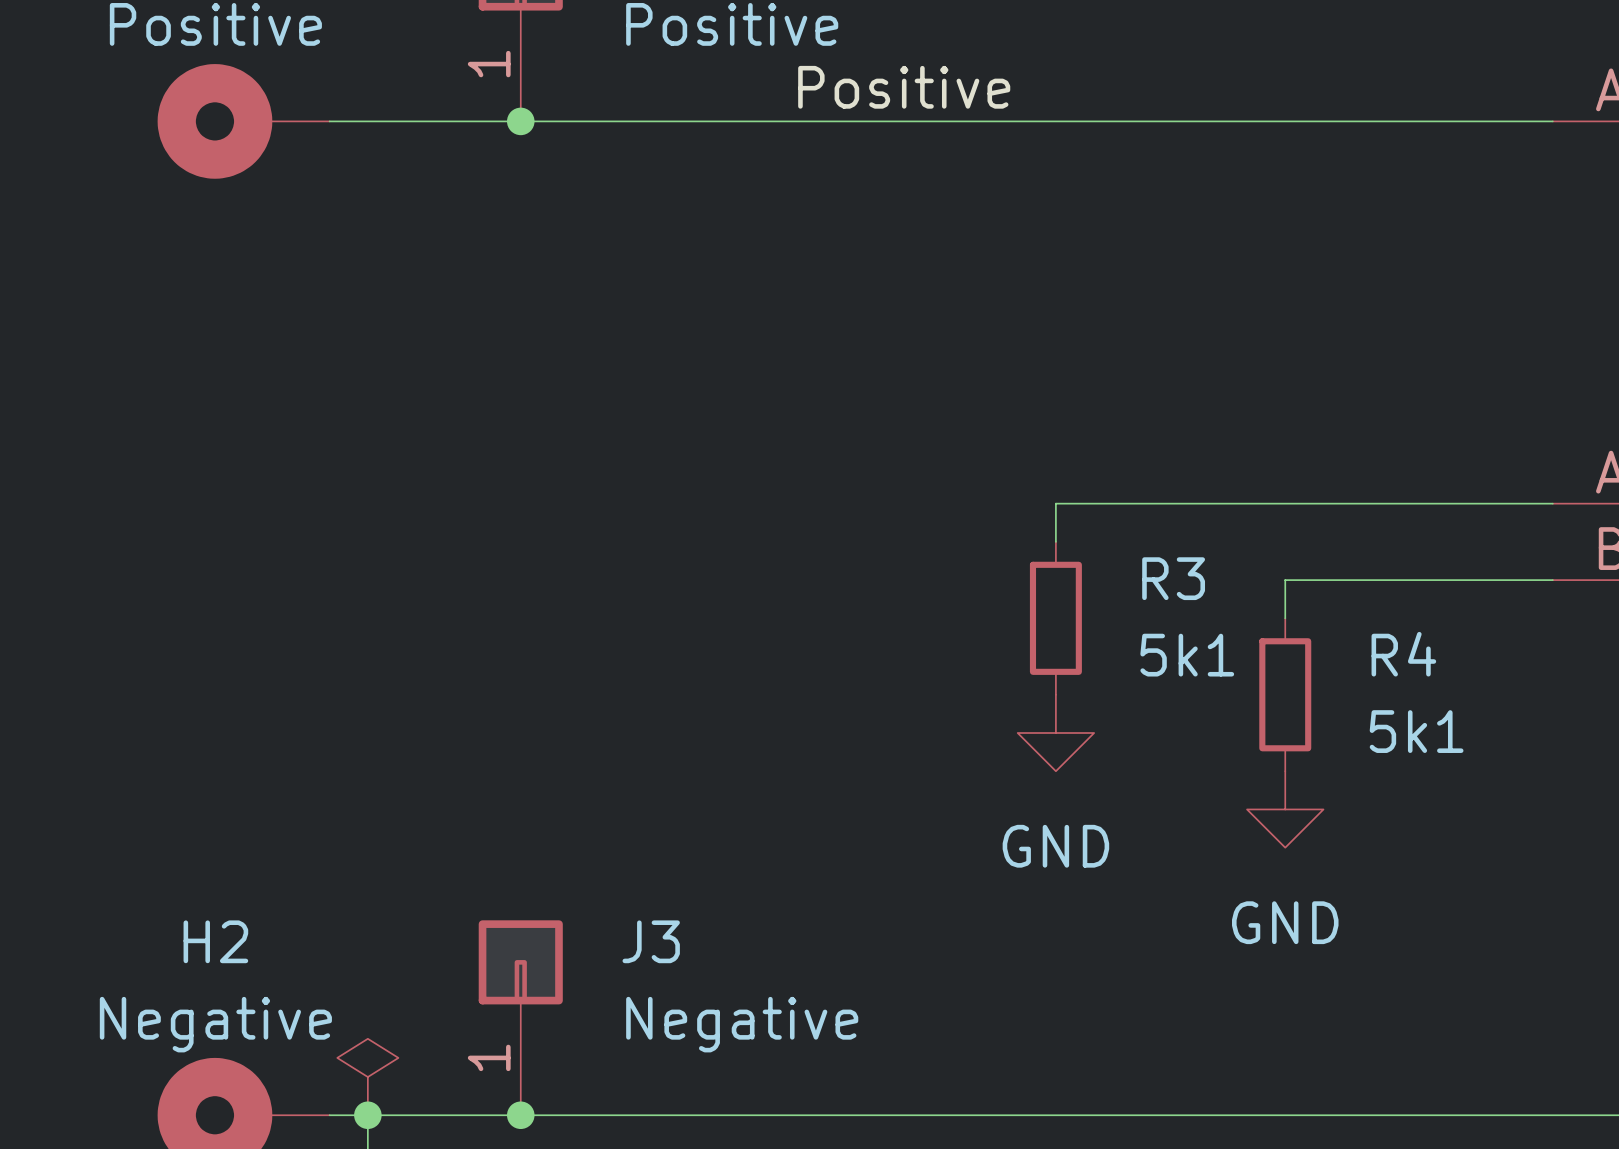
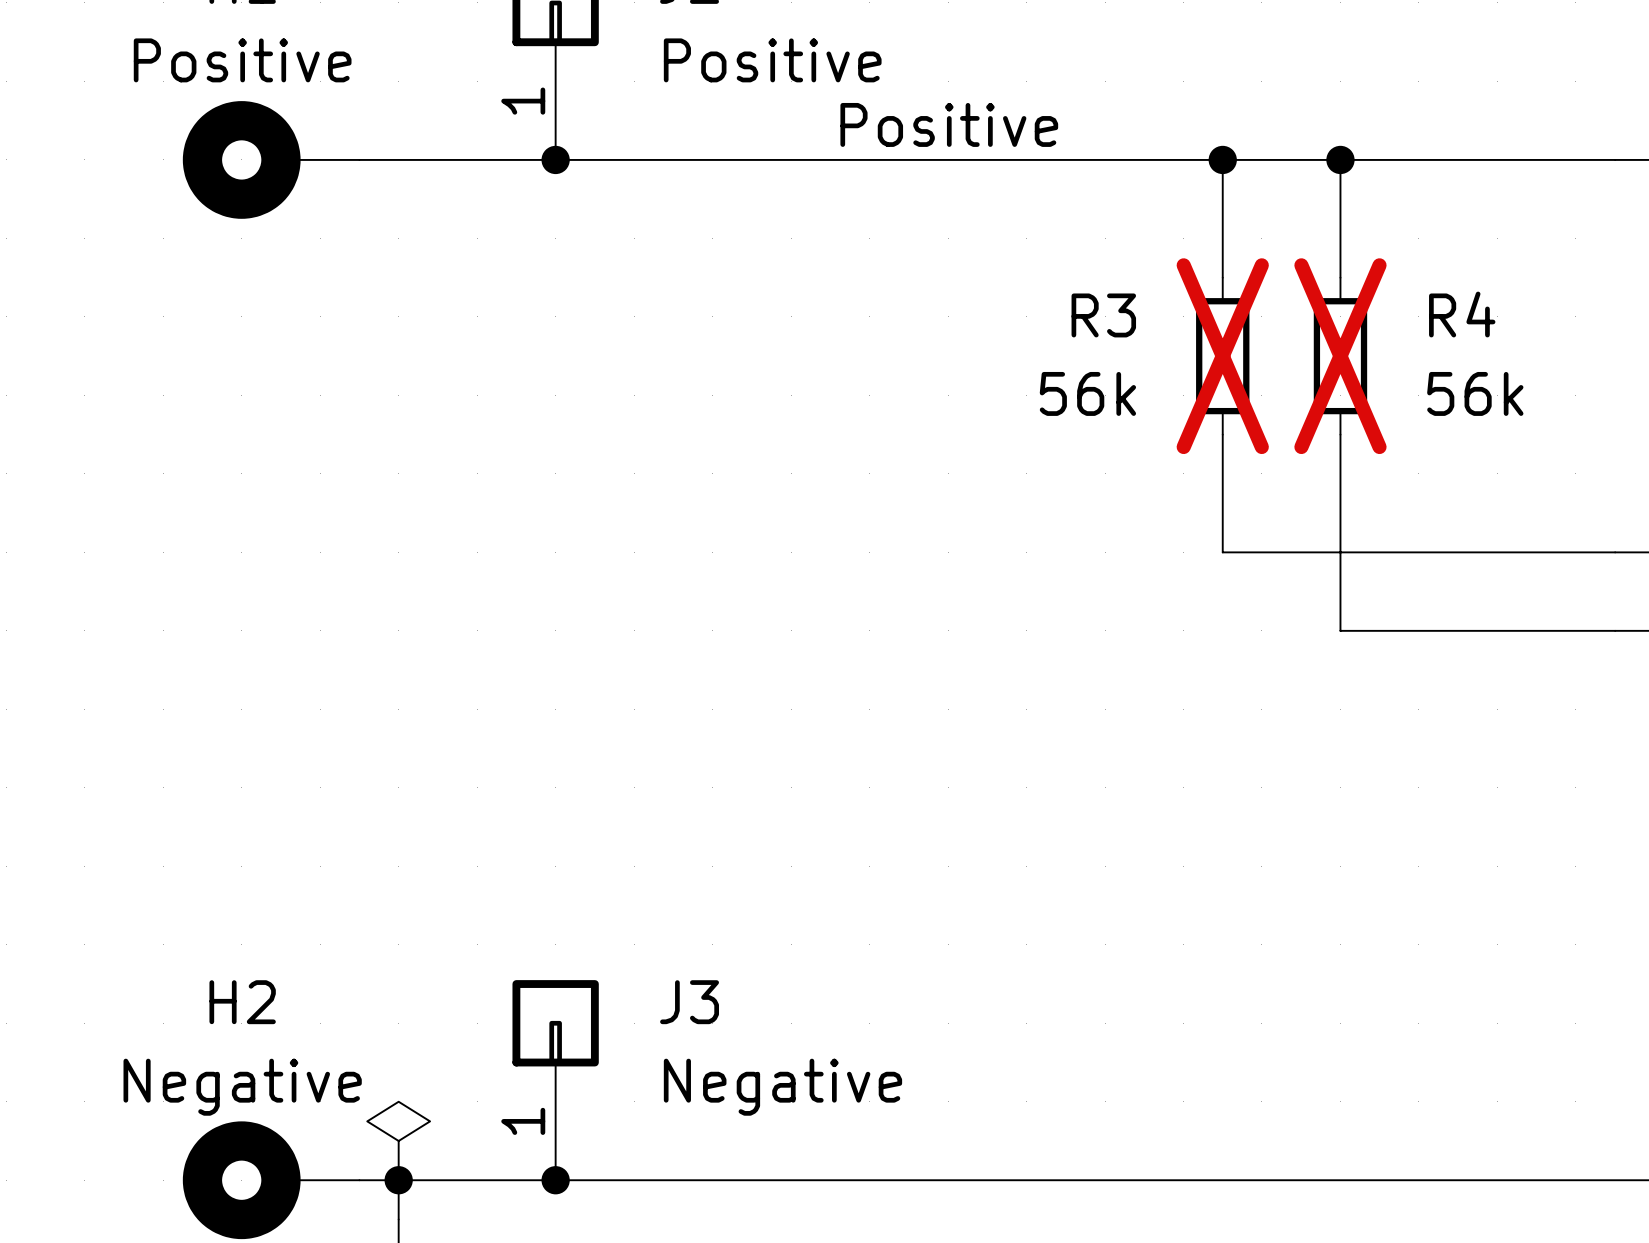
wire: none -> (1222, 159) (1222, 277)
junction: none -> (1222, 159)
wire: none -> (1340, 159) (1340, 277)
junction: none -> (1340, 159)
R3 do-not-place cross: none -> (1222, 356)
R4 do-not-place cross: none -> (1340, 356)
wire: (1170, 503) (1055, 503) (1055, 541) -> (1222, 552) (1222, 434)
R3 name position: R3 (1173, 578) -> R3 (1103, 315)
wire: (1285, 580) (1285, 618) -> (1340, 630) (1340, 434)
R3 position: (1055, 618) -> (1222, 356)
R3 value: 5k1 (1187, 655) -> 56k (1087, 393)
R4 position: (1285, 694) -> (1340, 356)
R4 value: 5k1 (1416, 731) -> 56k (1475, 393)
power symbol: GND (1055, 733) -> none
power symbol: GND (1285, 809) -> none

